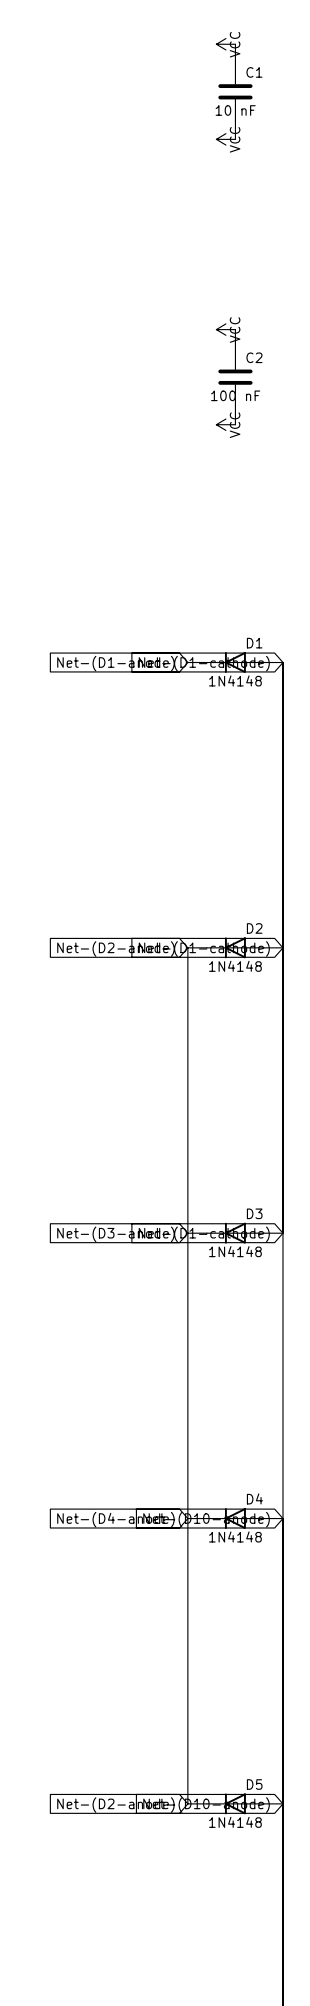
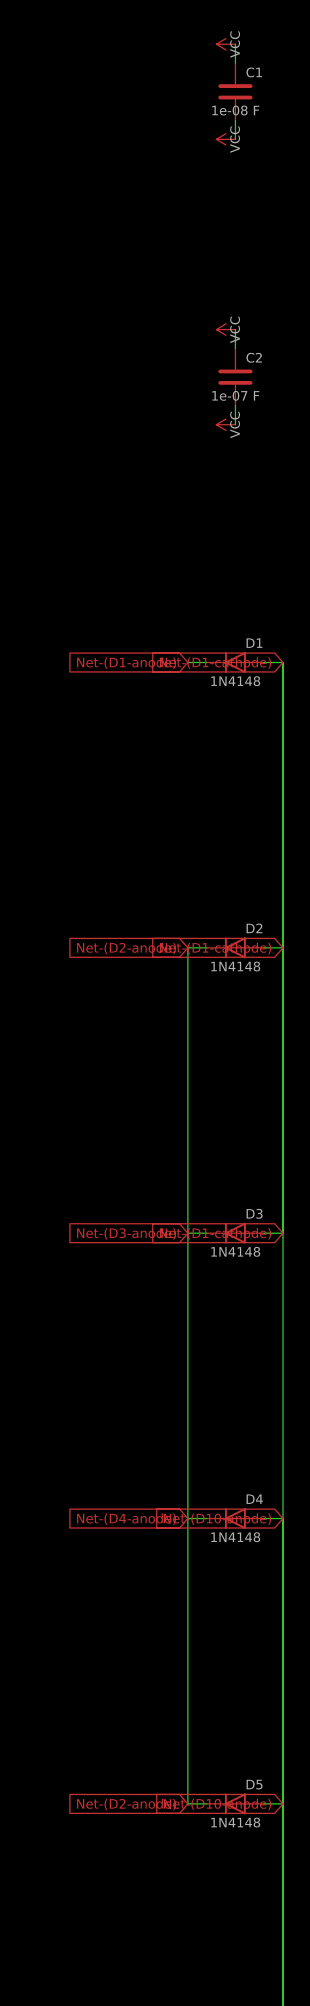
C1 value: 10 nF (235, 110) -> 1e-08 F (235, 110)
C2 value: 100 nF (235, 395) -> 1e-07 F (235, 395)

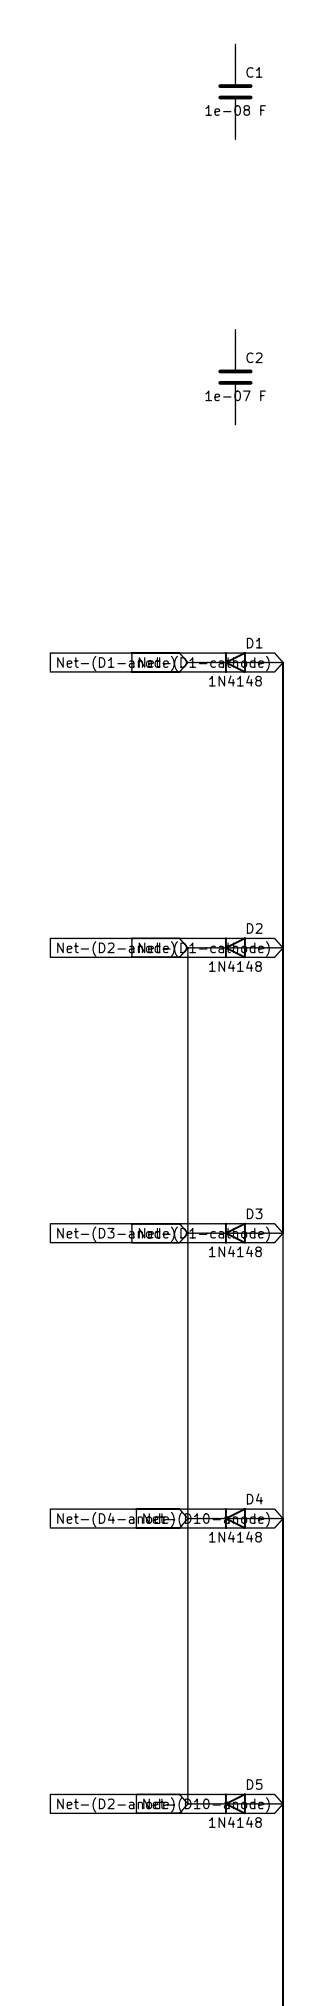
power symbol: VCC (225, 44) -> none
power symbol: VCC (225, 139) -> none
power symbol: VCC (225, 329) -> none
power symbol: VCC (225, 424) -> none

